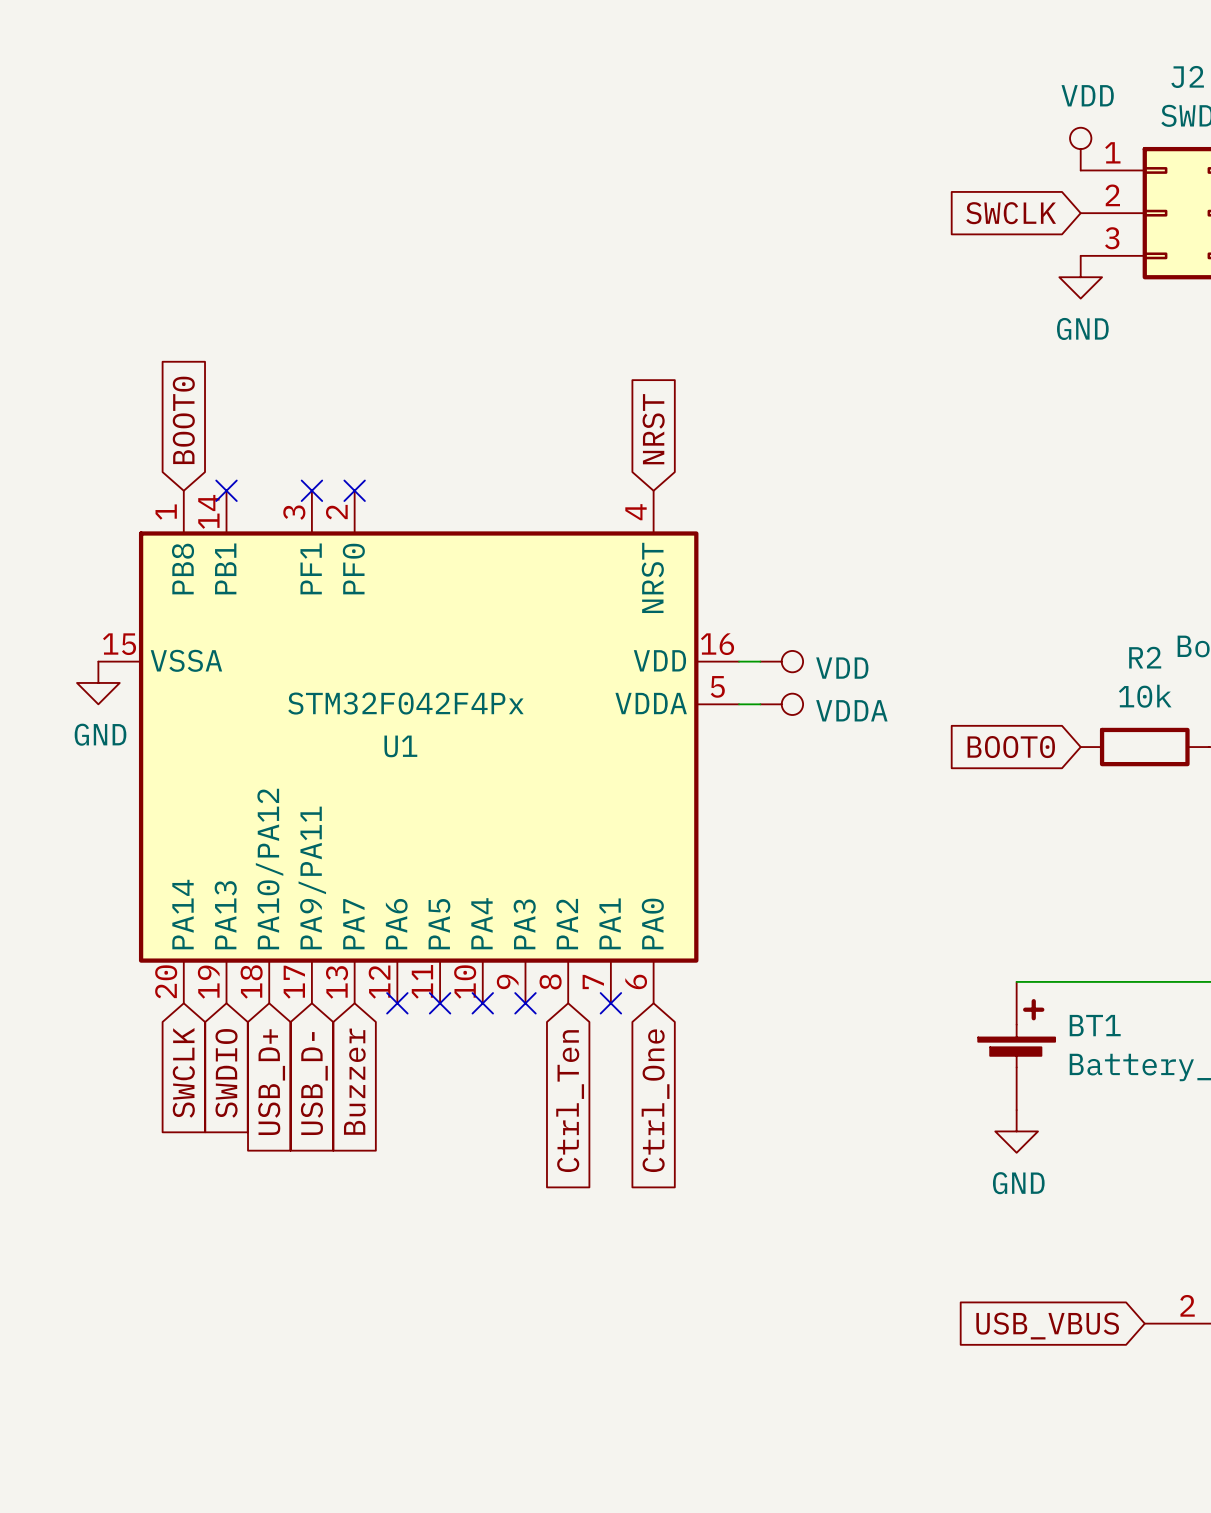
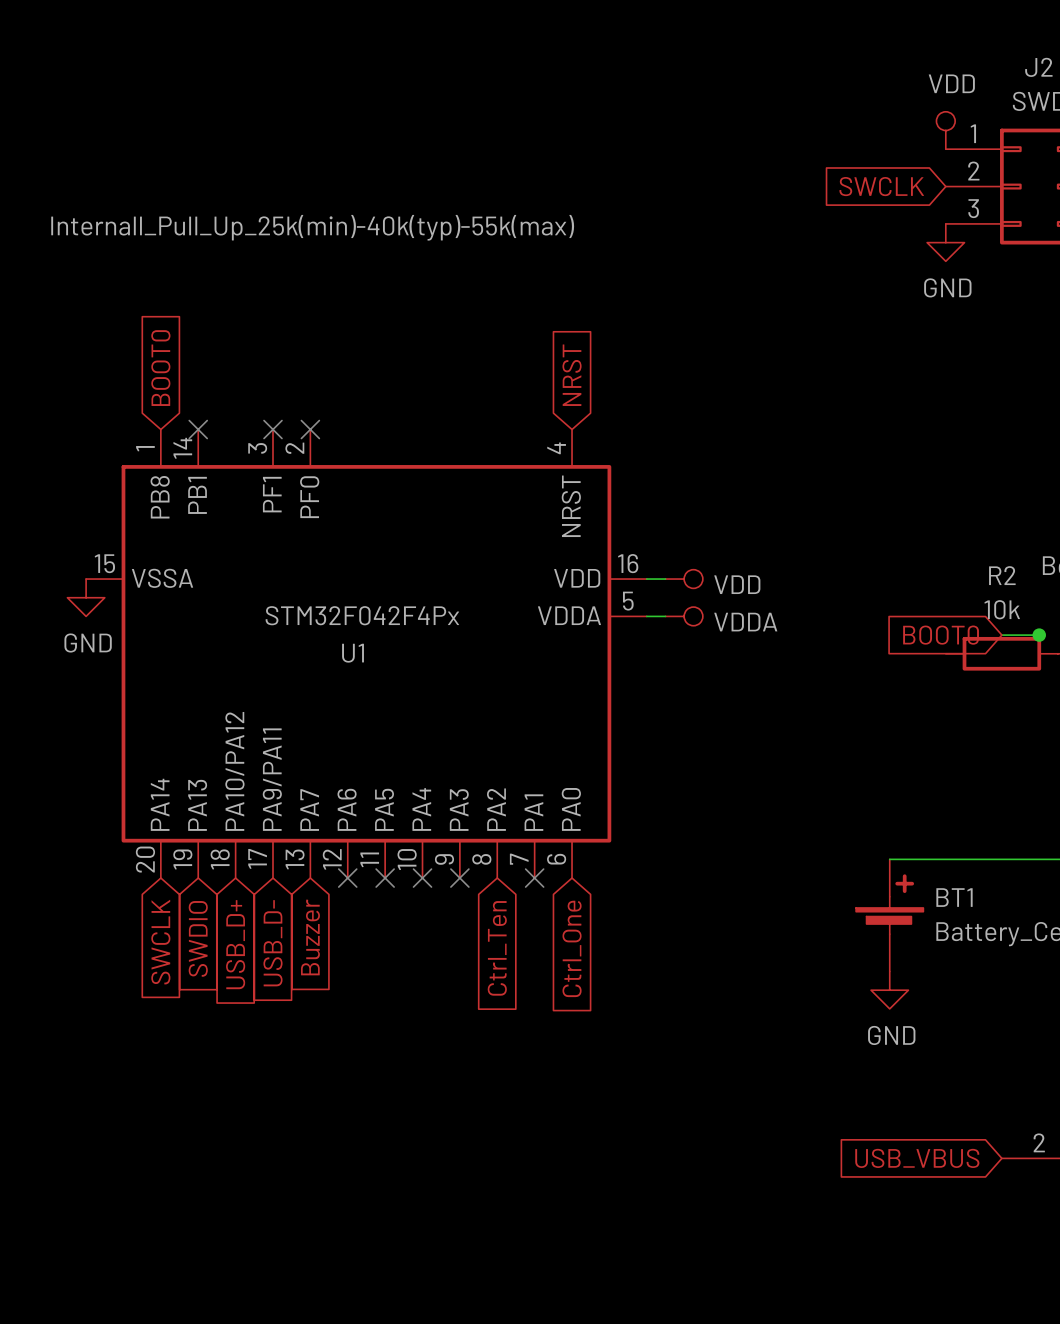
label: none -> Internall_Pull_Up_25k(min)-40k(typ)-55k(max) (312, 227)
wire: none -> (1001, 635) (1039, 635)
junction: none -> (1039, 635)
global label position: BOOT0 (1011, 747) -> BOOT0 (941, 635)

